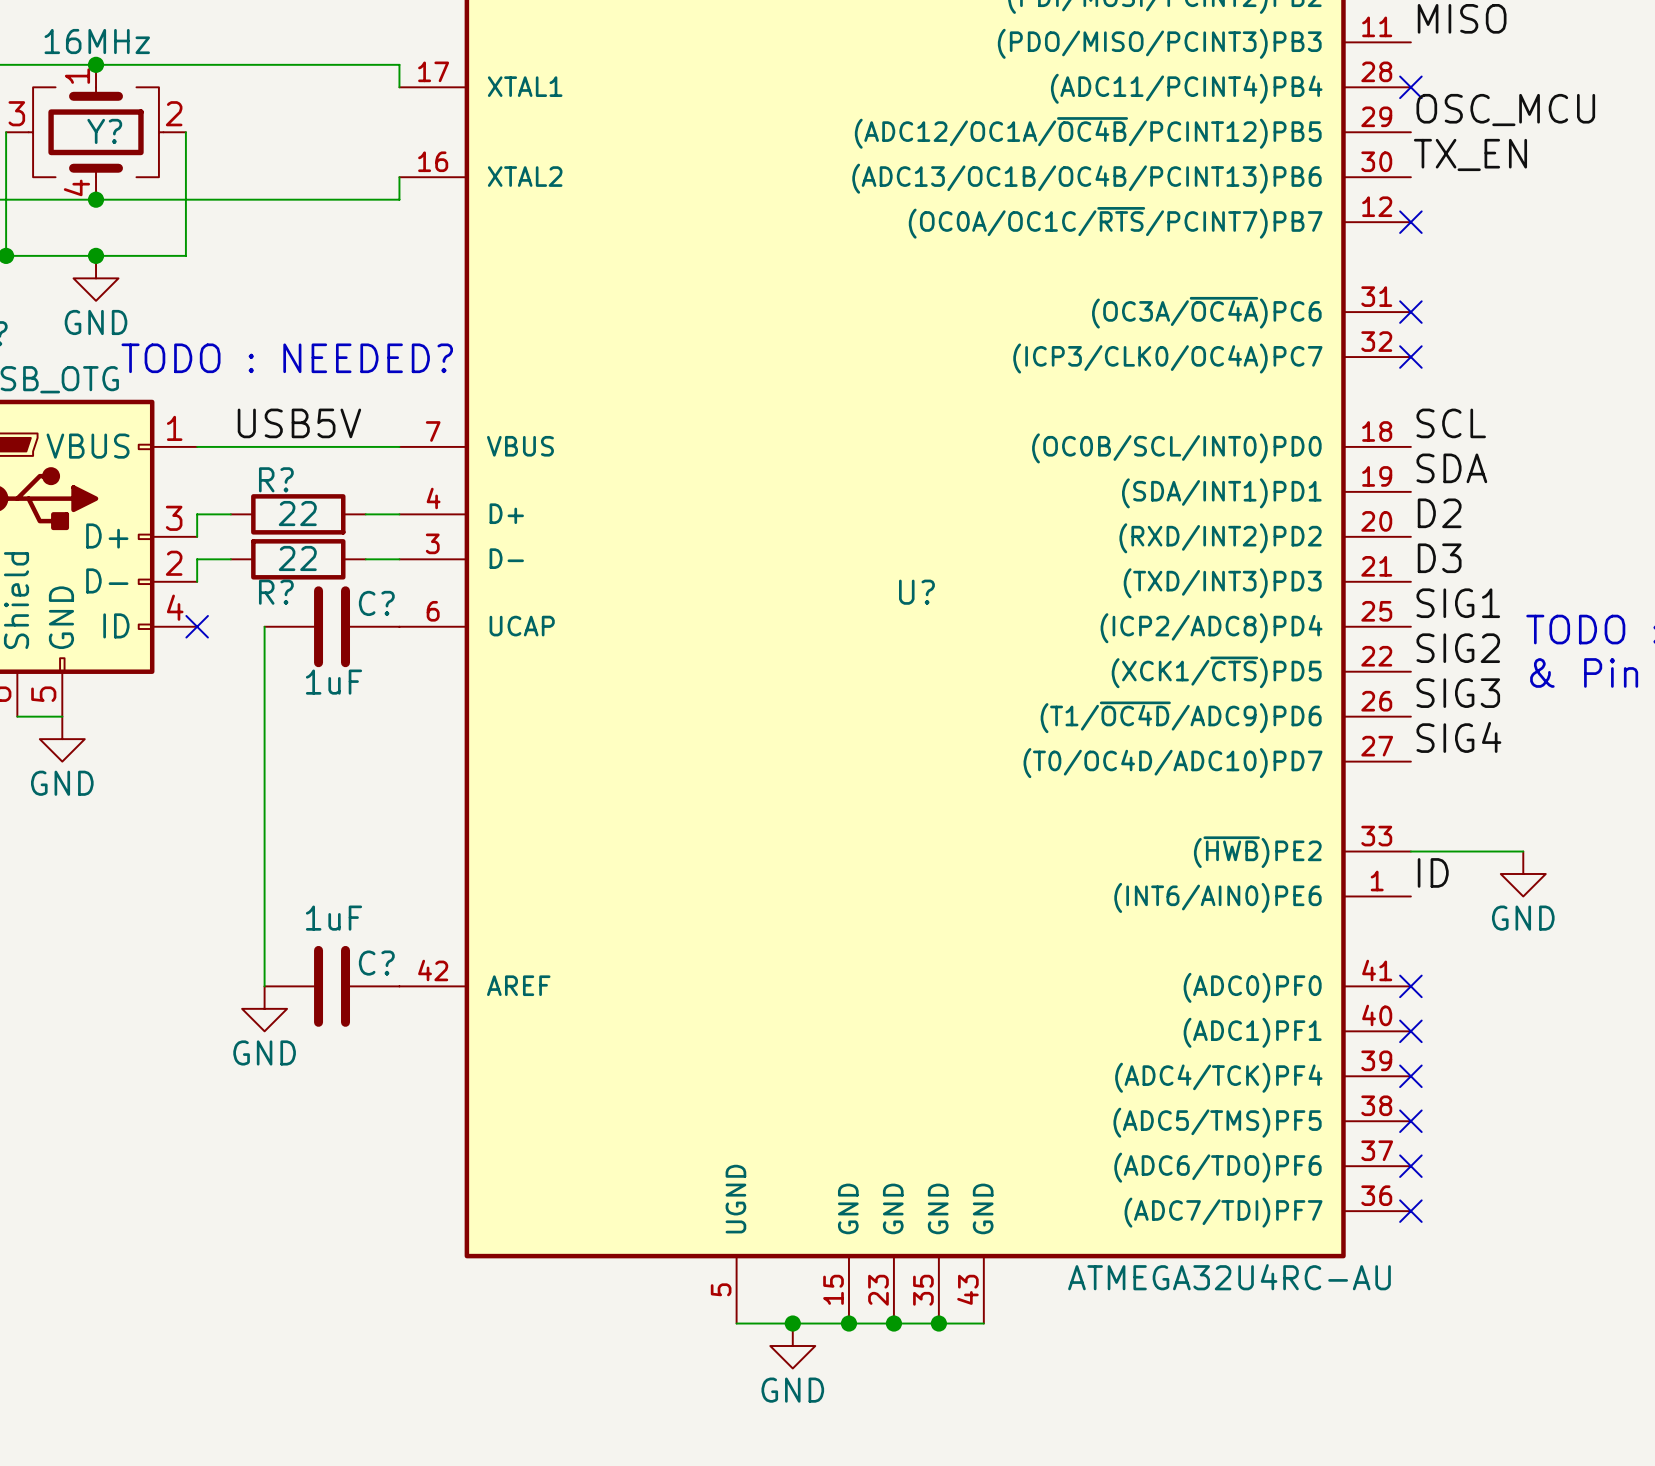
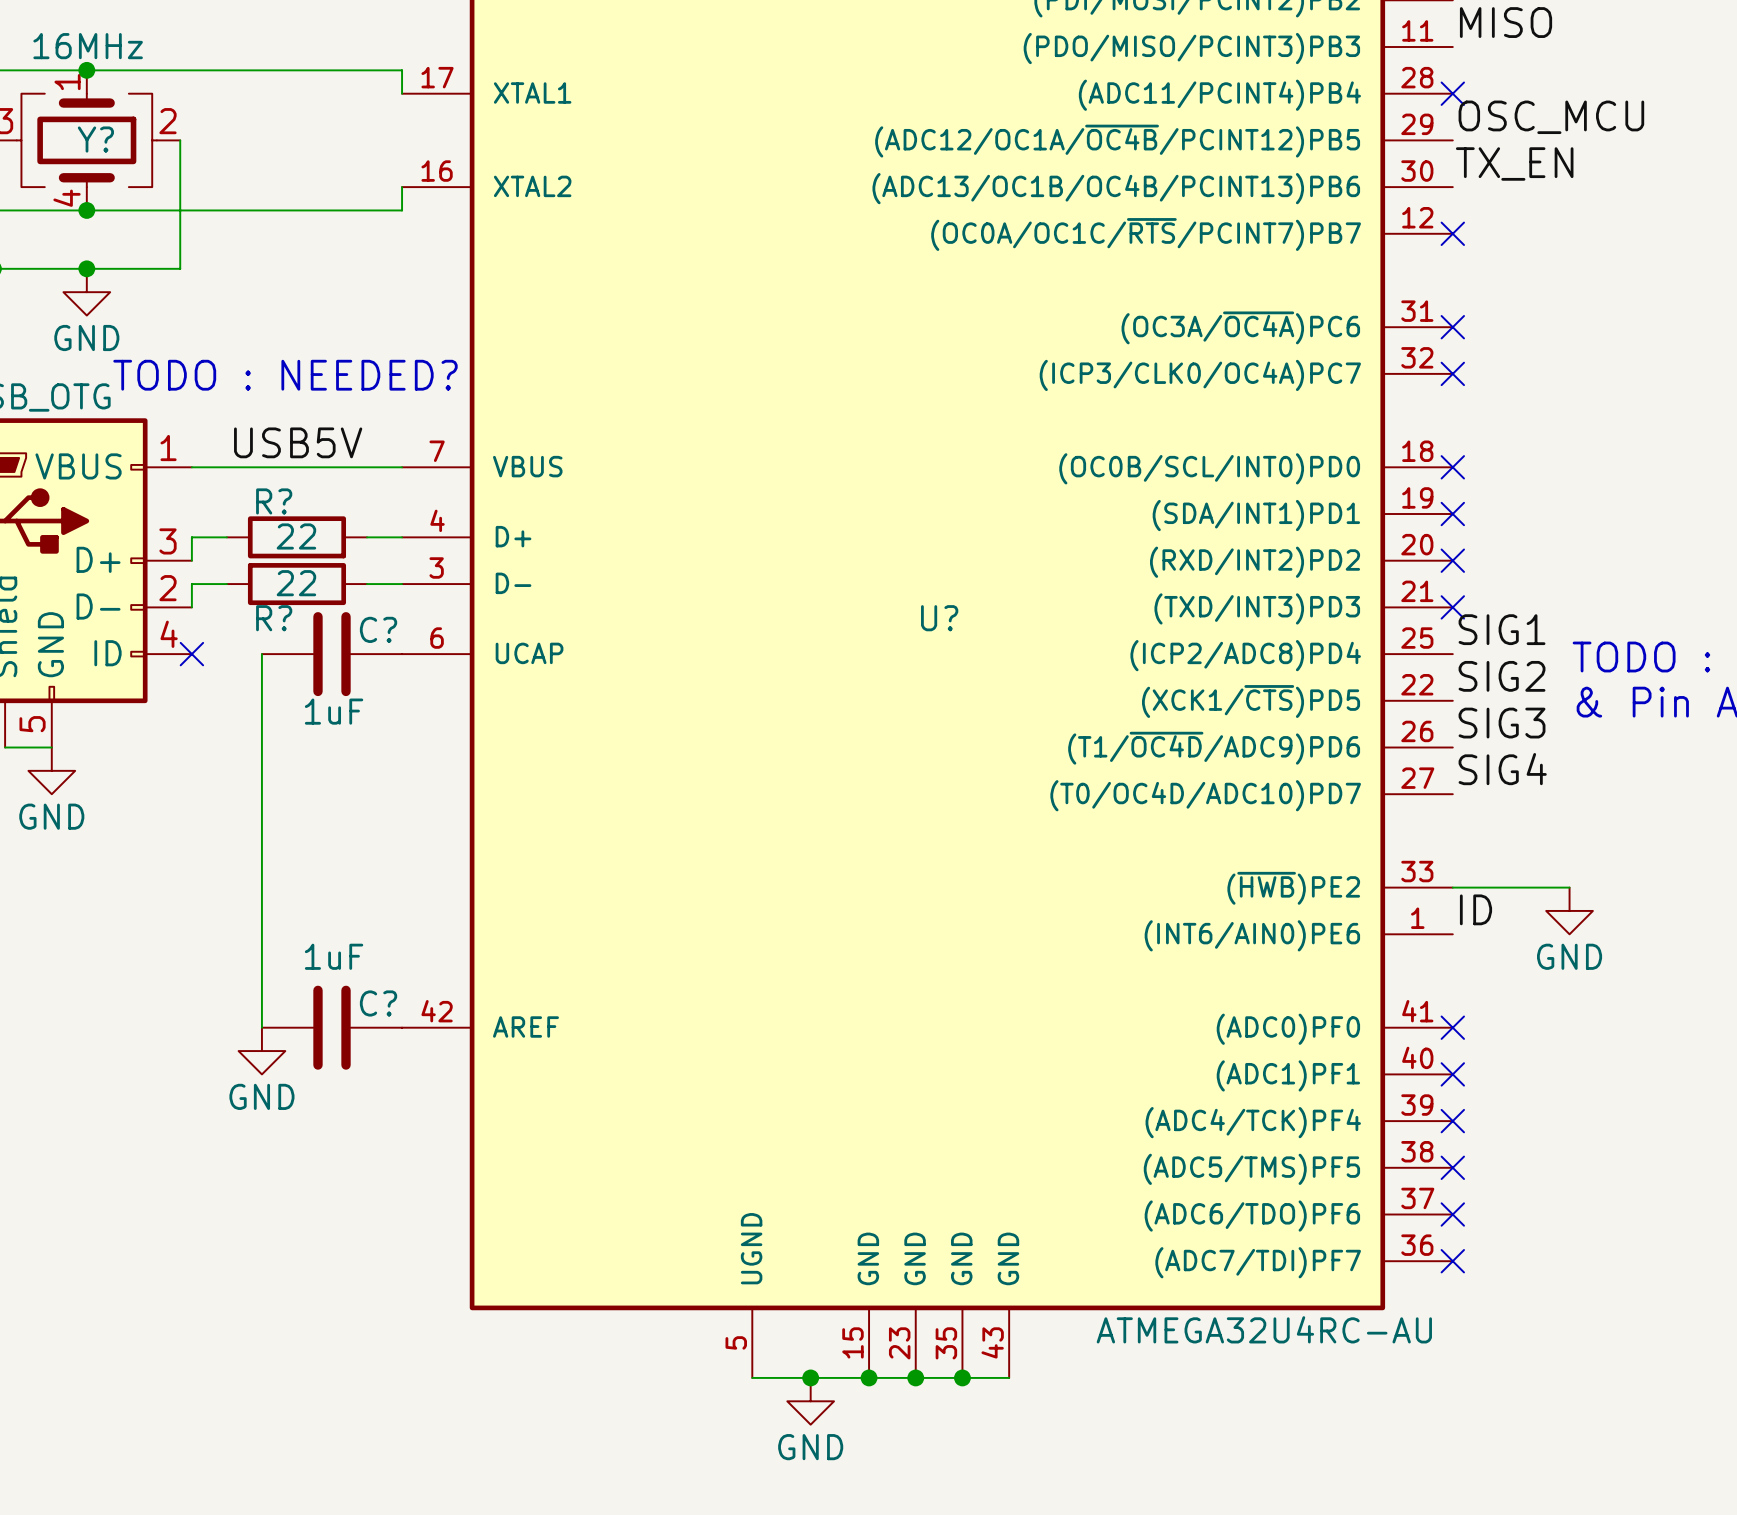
label: SCL (1451, 423) -> none
no-connect mark: none -> (1452, 467)
label: SDA (1451, 468) -> none
no-connect mark: none -> (1452, 514)
label: D2 (1439, 513) -> none
no-connect mark: none -> (1452, 560)
label: D3 (1439, 558) -> none
no-connect mark: none -> (1452, 607)

